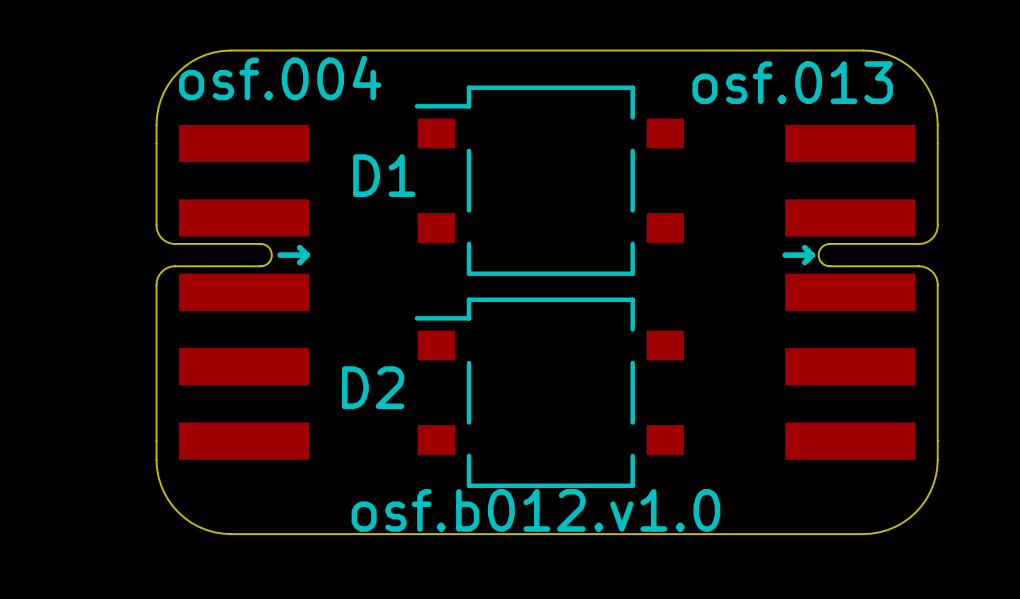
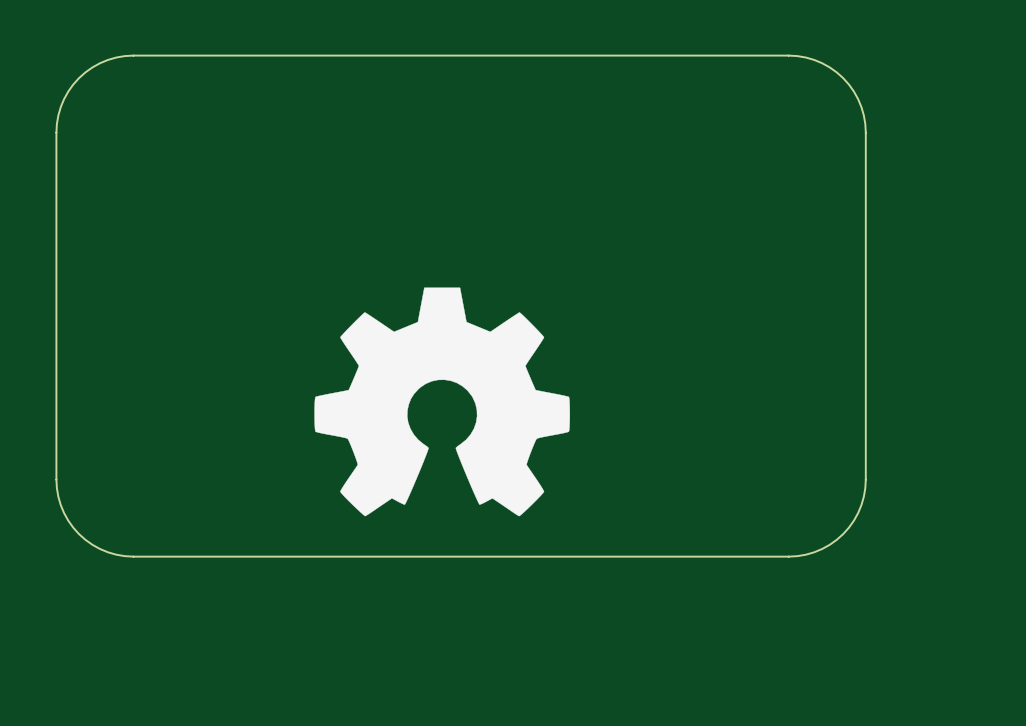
text: osf.004 (280, 77) -> none
text: osf.013 (792, 82) -> none
board edge: none -> (56, 151) (56, 460)
board edge: none -> (865, 151) (865, 460)
D1: (549, 180) -> none
drawing: none -> [314, 287, 571, 517]
part: (232, 292) -> none
part: (860, 292) -> none
D2: (549, 392) -> none
text: osf.b012.v1.0 (535, 510) -> none

